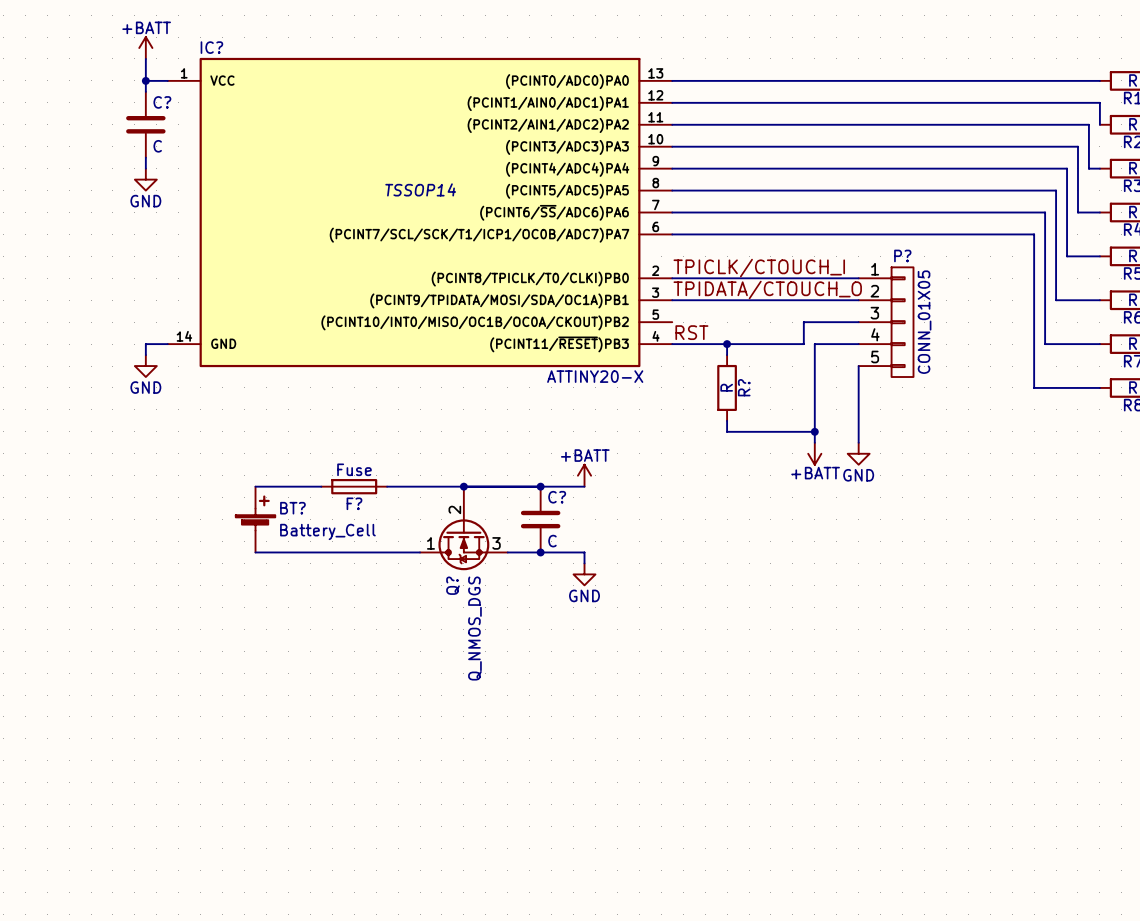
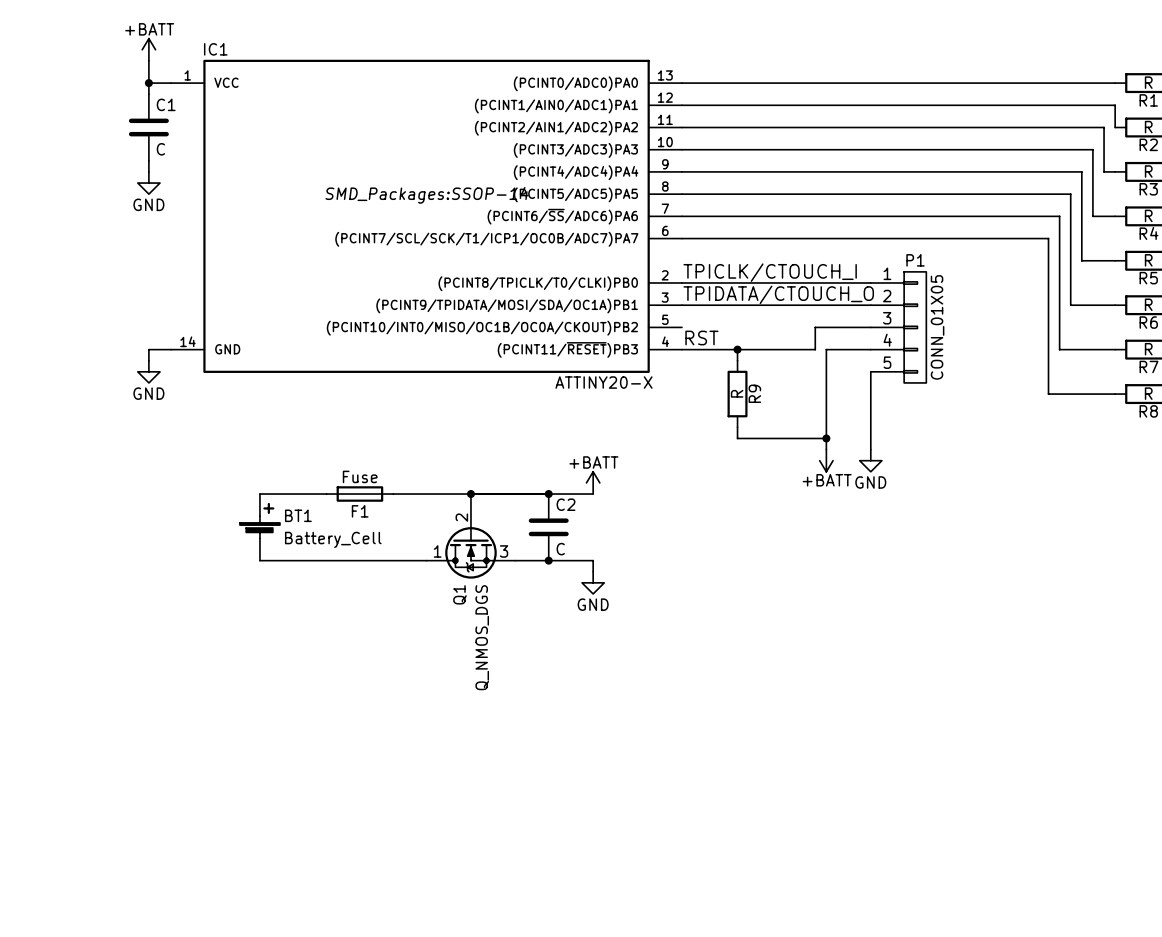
IC? name: IC? (211, 47) -> IC1 (215, 49)
C? name: C? (162, 102) -> C1 (166, 104)
IC? text: TSSOP14 (420, 189) -> SMD_Packages:SSOP-14 (427, 195)
P? name: P? (902, 255) -> P1 (915, 260)
R? name: R? (744, 387) -> R9 (754, 393)
C? name: C? (557, 497) -> C2 (566, 504)
F? name: F? (354, 503) -> F1 (360, 511)
BT? name: BT? (292, 508) -> BT1 (298, 515)
Q? name: Q? (453, 585) -> Q1 (459, 594)

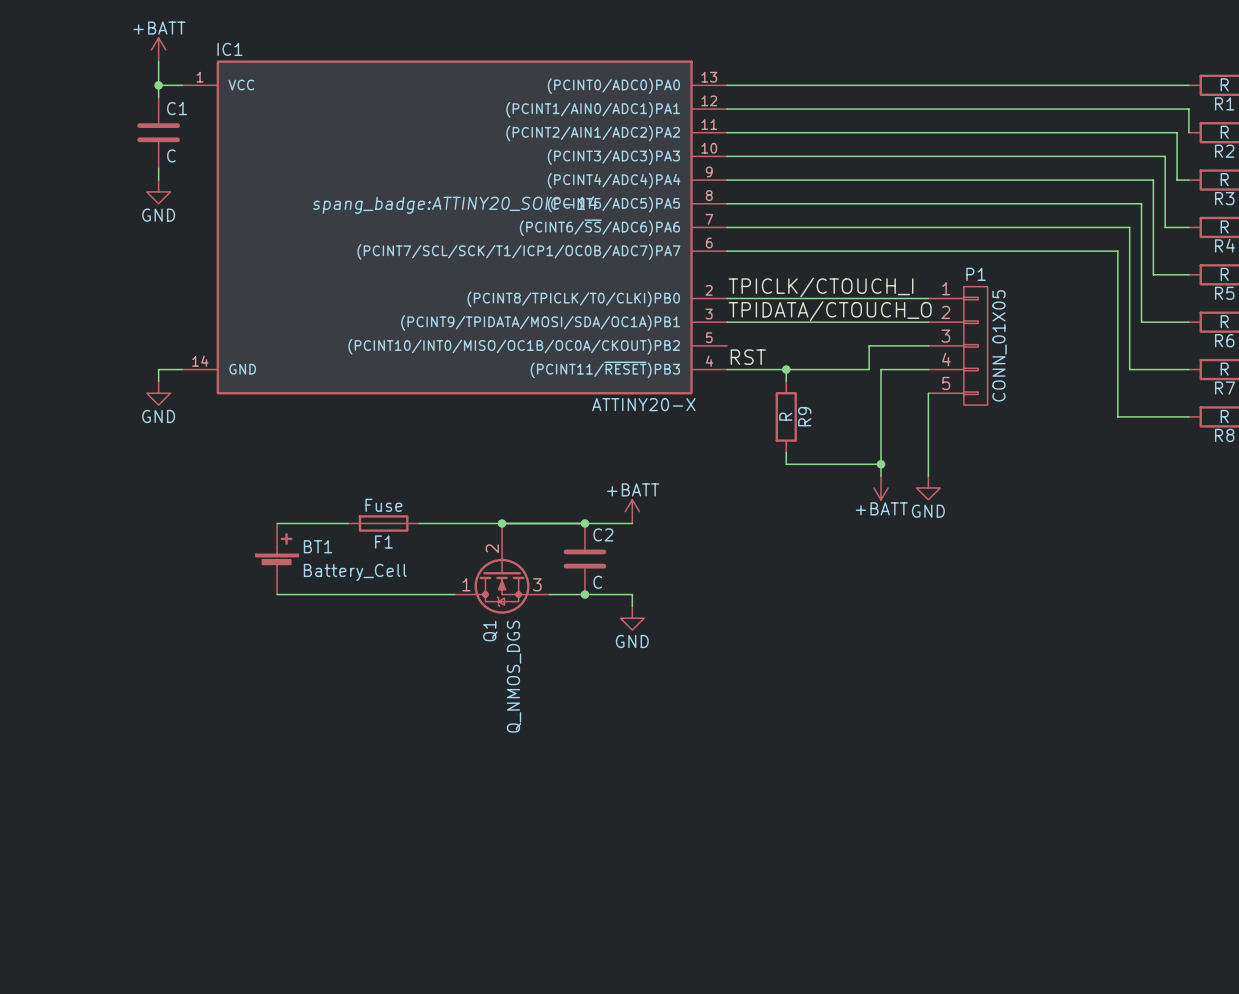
IC1 text: SMD_Packages:SSOP-14 (427, 195) -> spang_badge:ATTINY20_SOIC-14 (455, 205)

